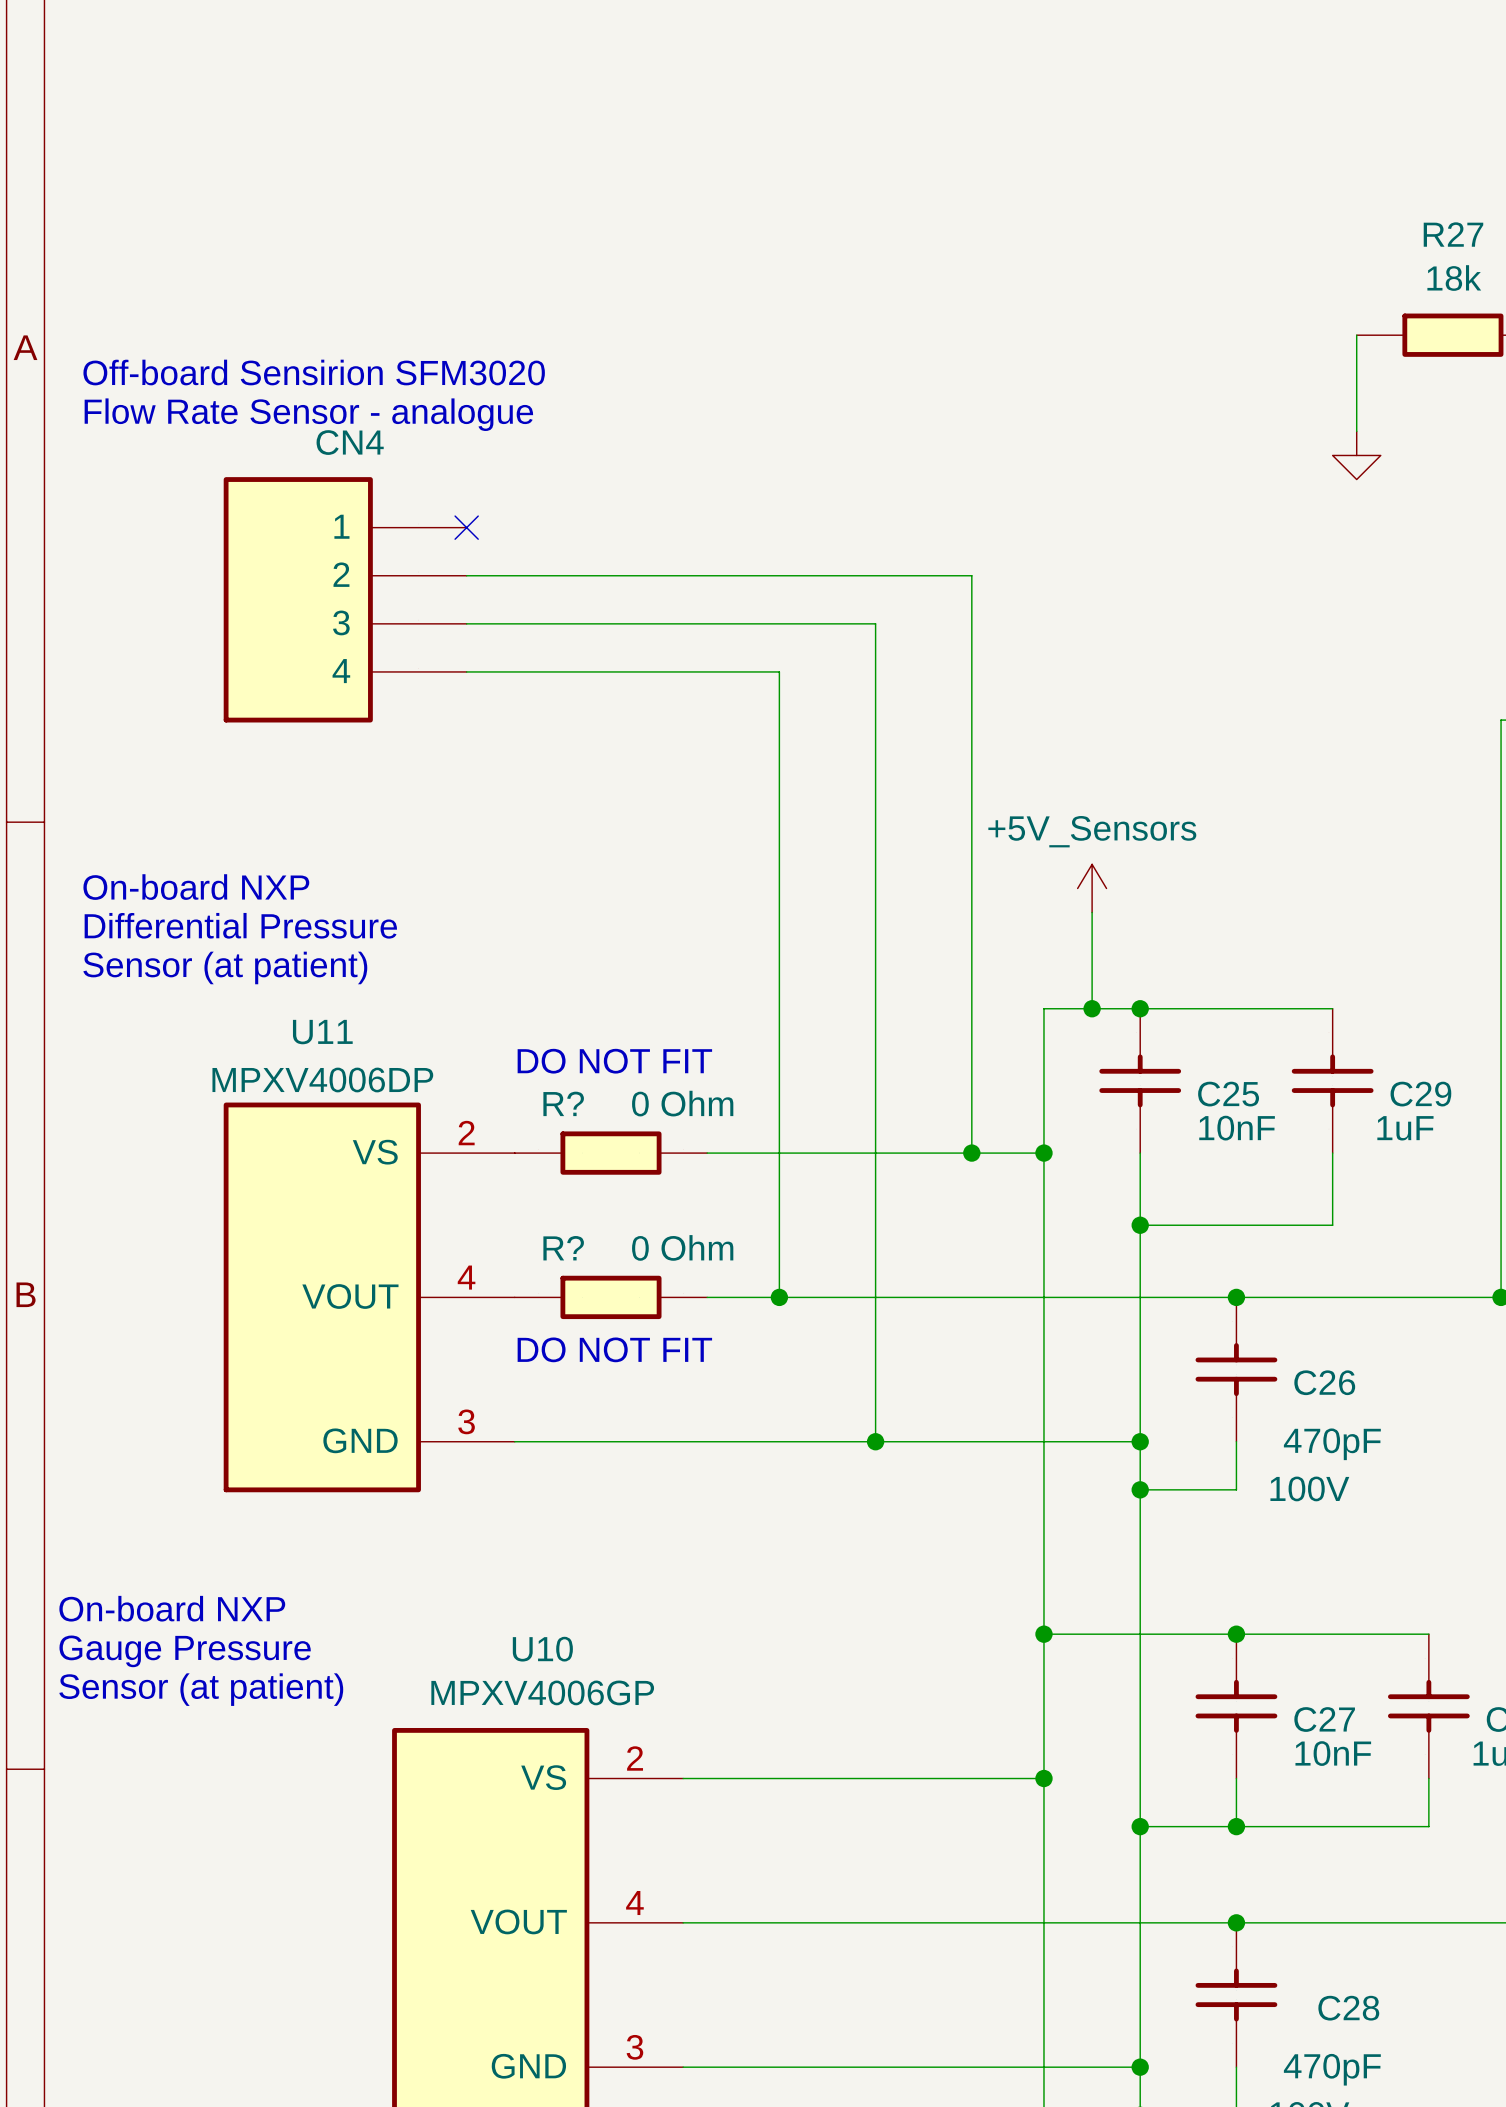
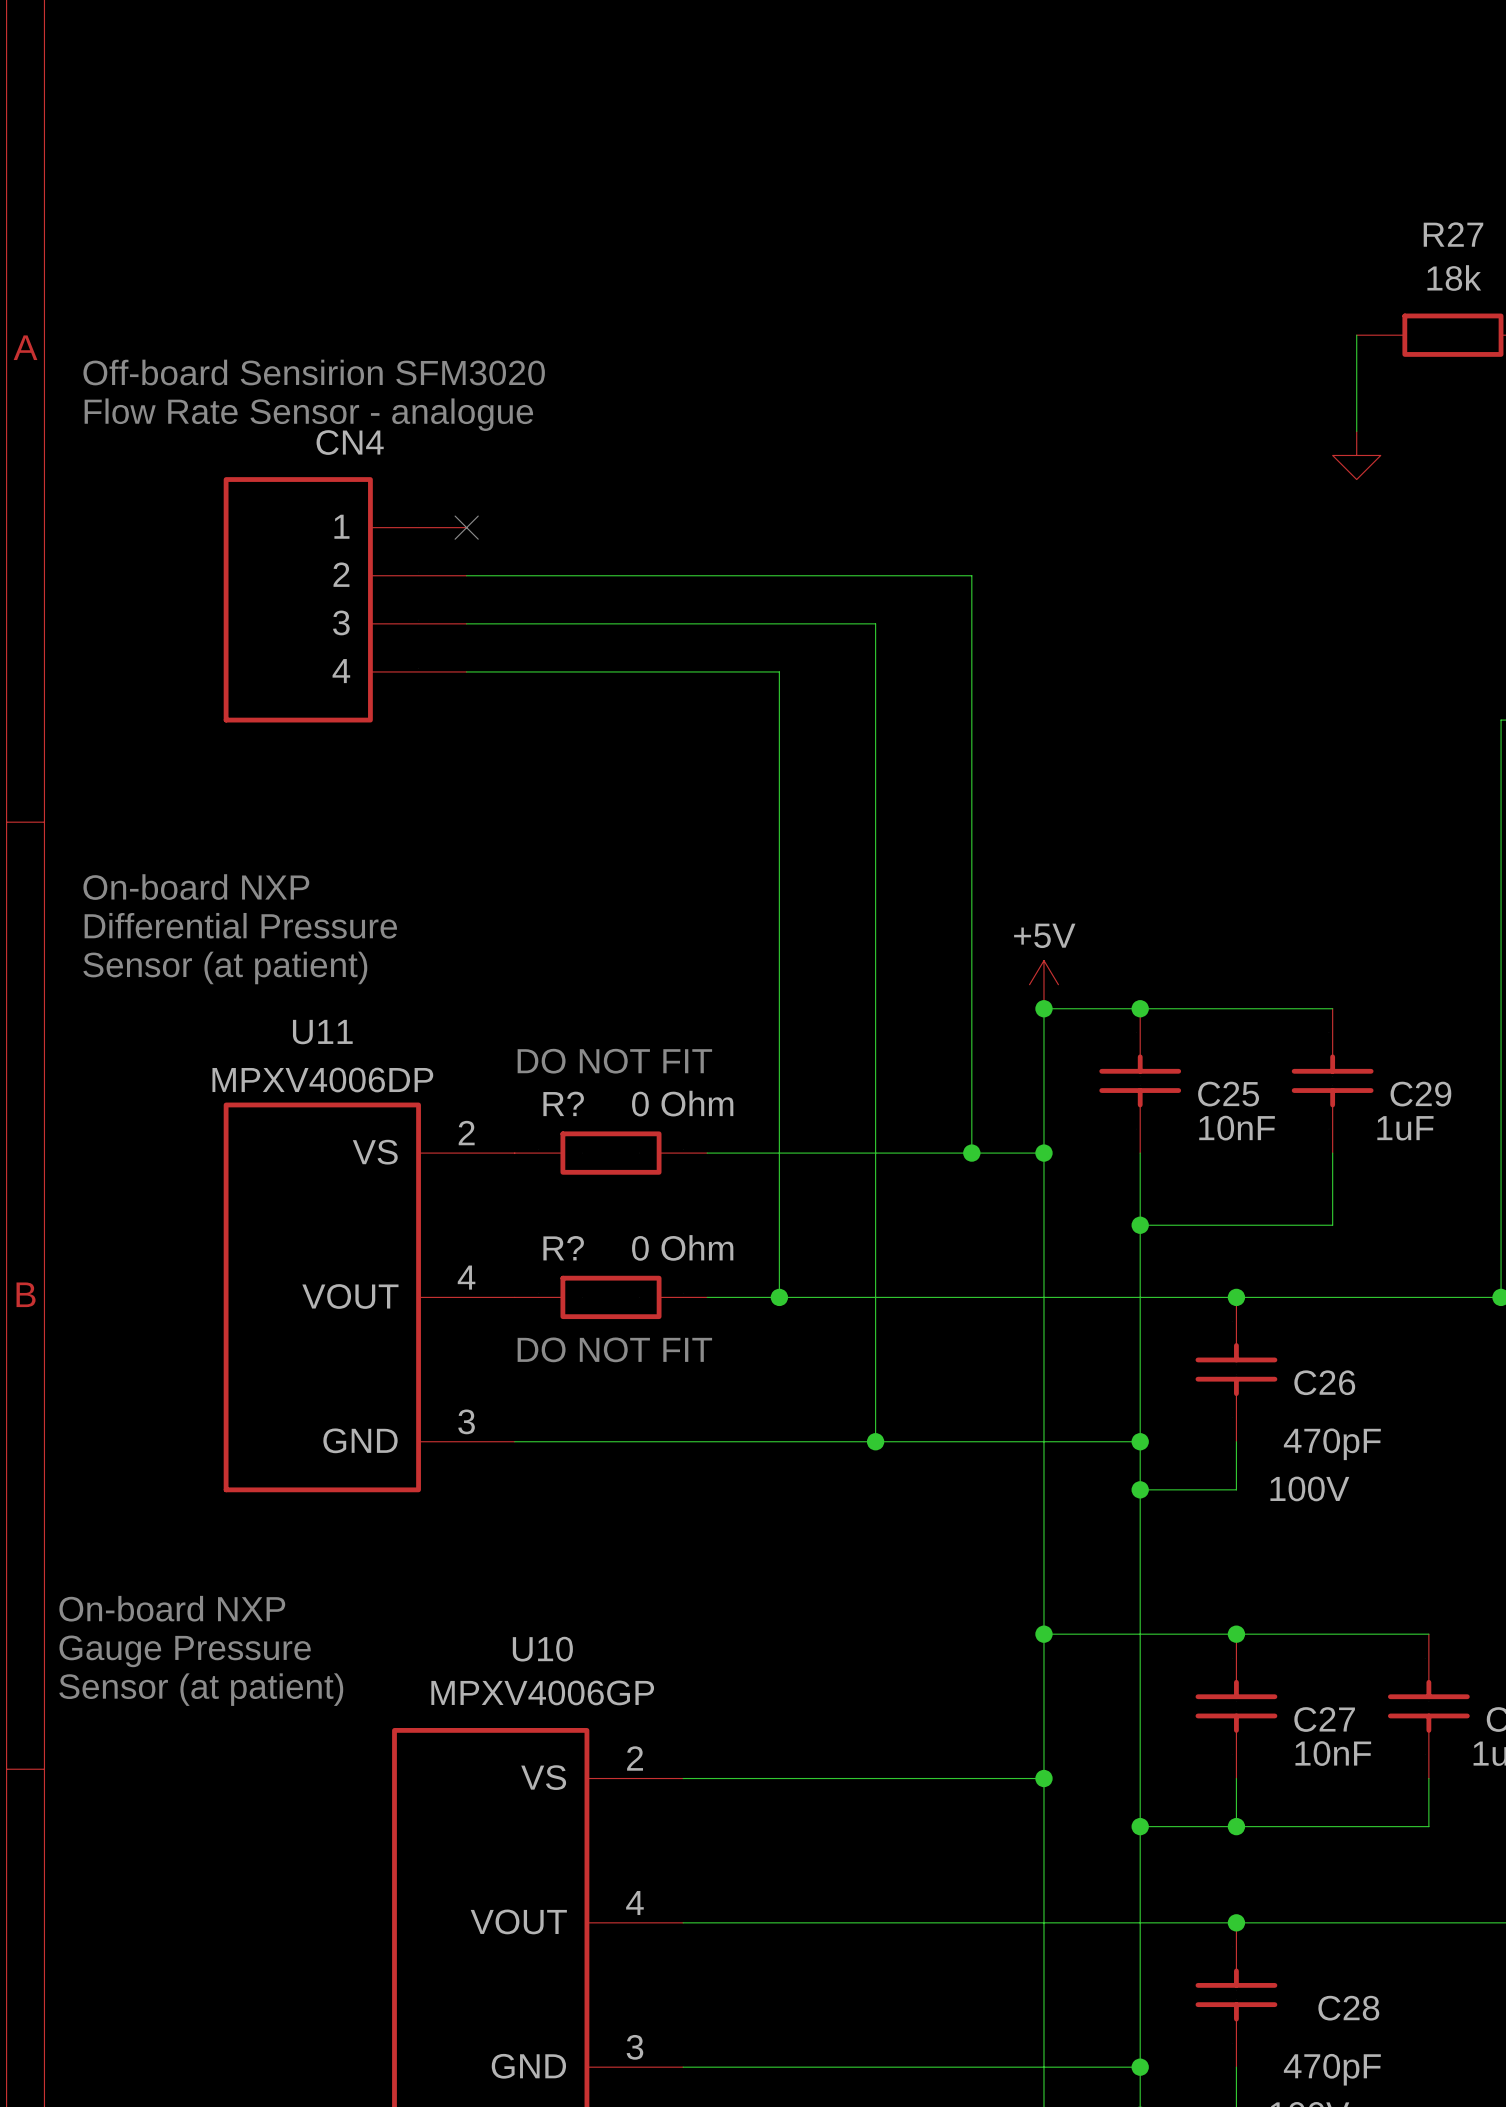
power symbol: +5V_Sensors (1092, 888) -> none
wire: (1092, 912) (1092, 1008) -> none
power symbol: none -> +5V (1043, 984)
junction position: (1092, 1008) -> (1043, 1008)

